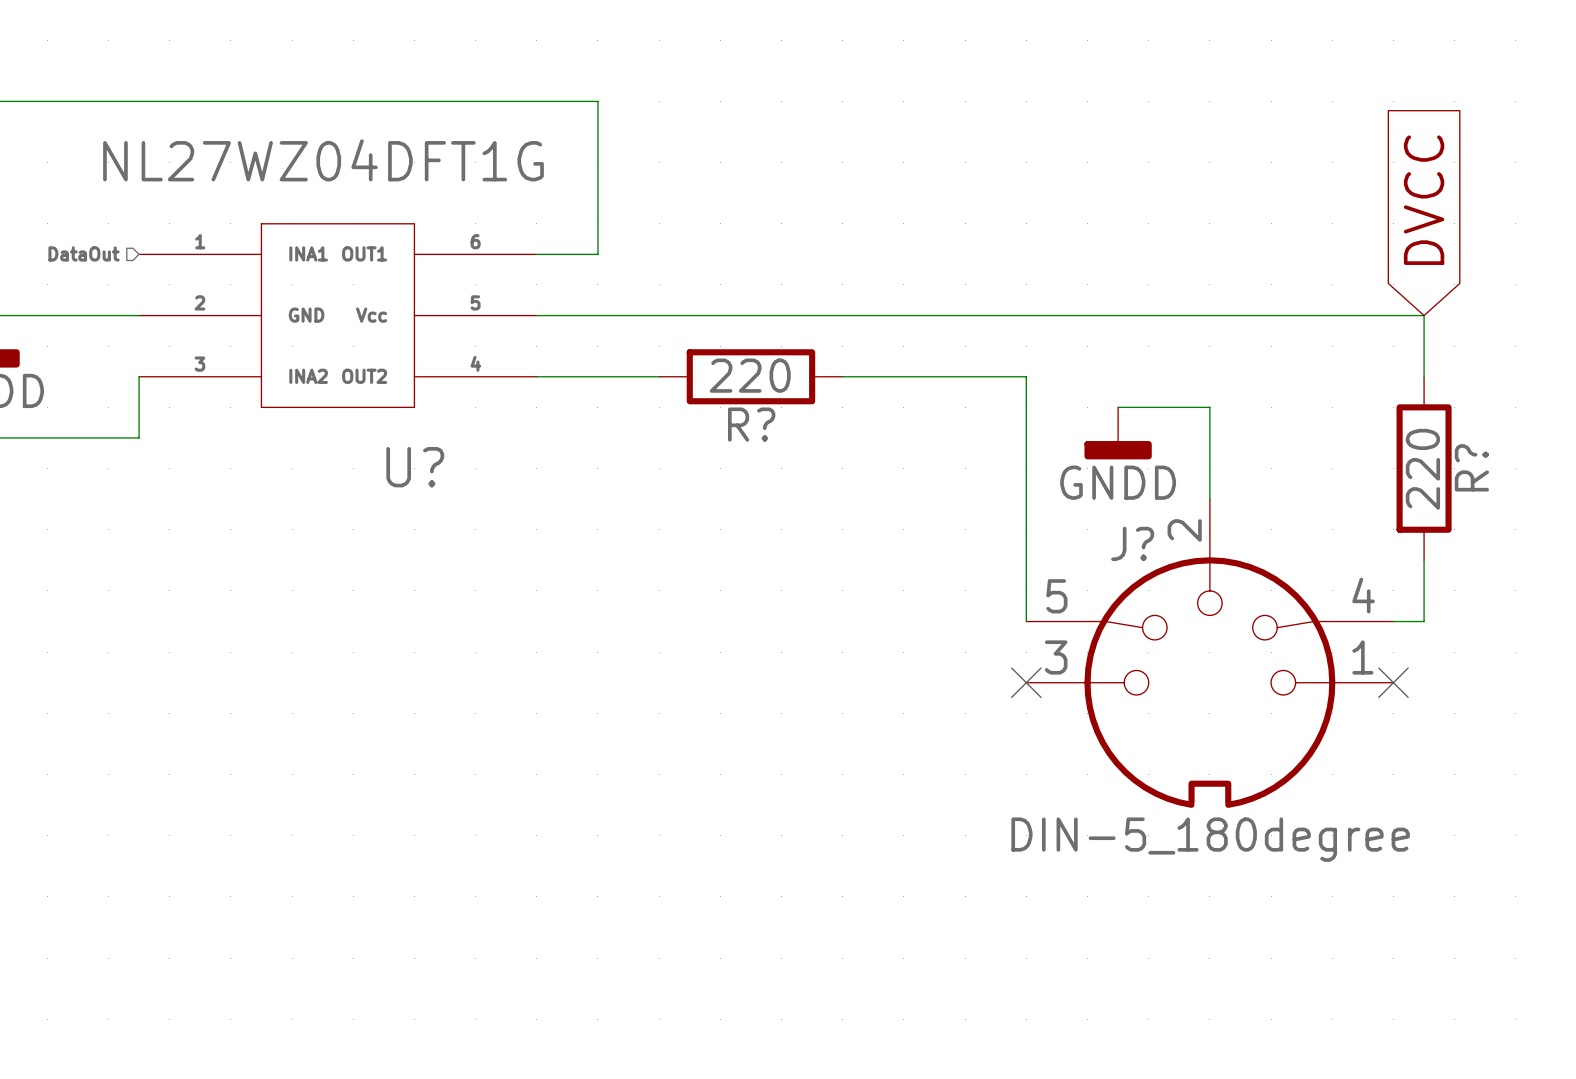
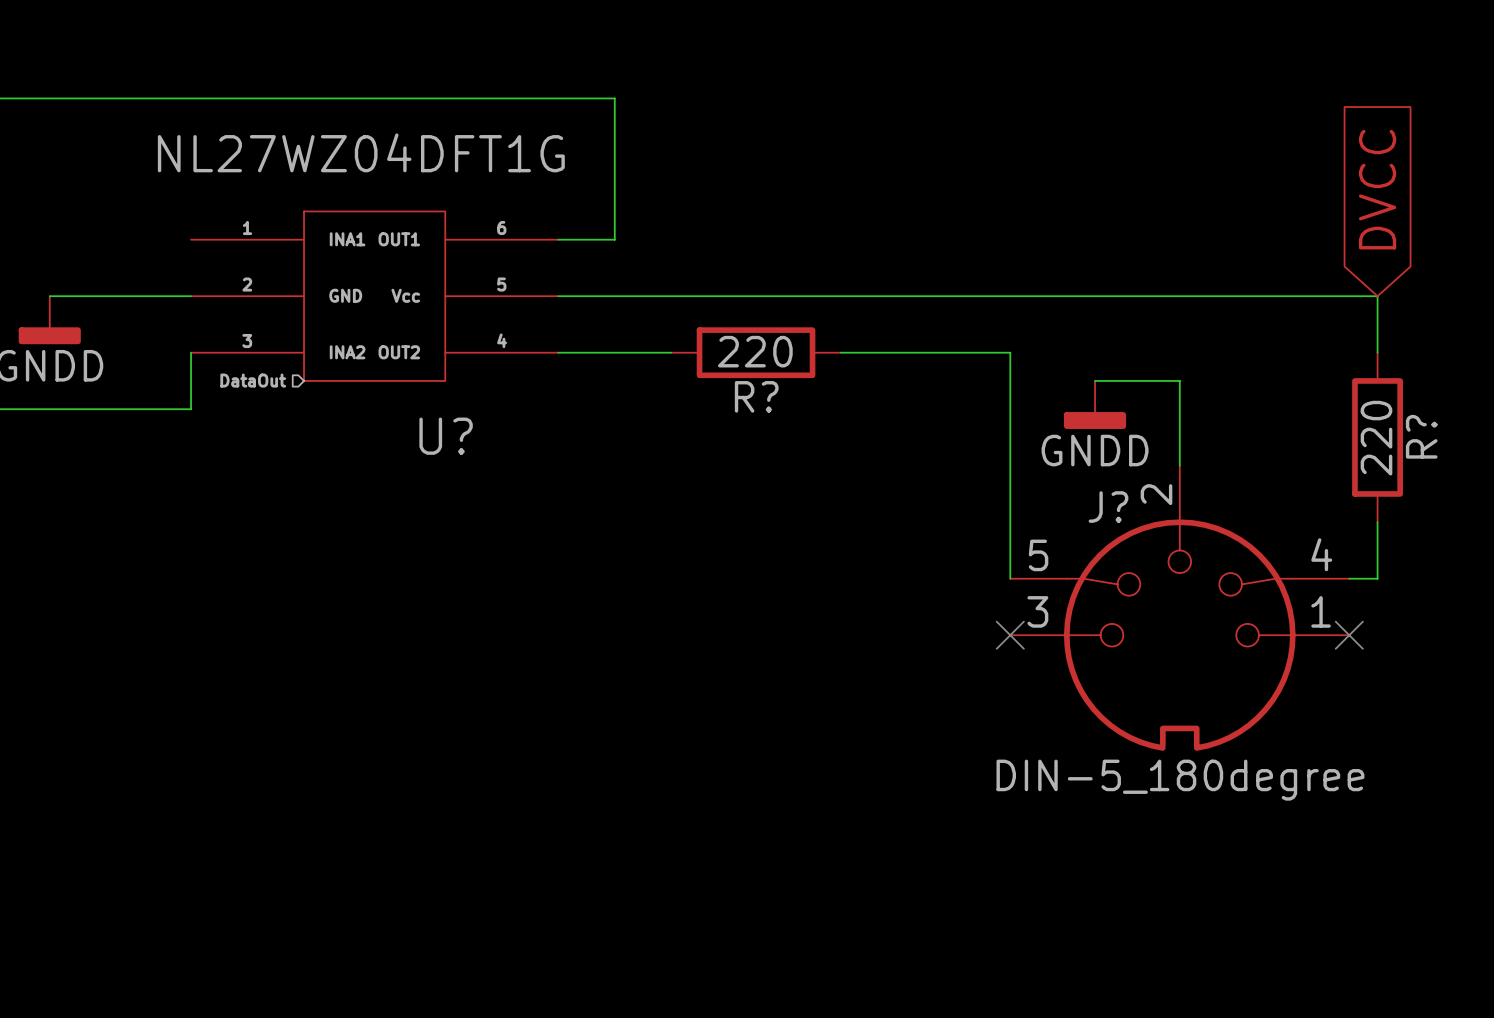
hierarchical label position: DataOut (84, 253) -> DataOut (253, 380)

